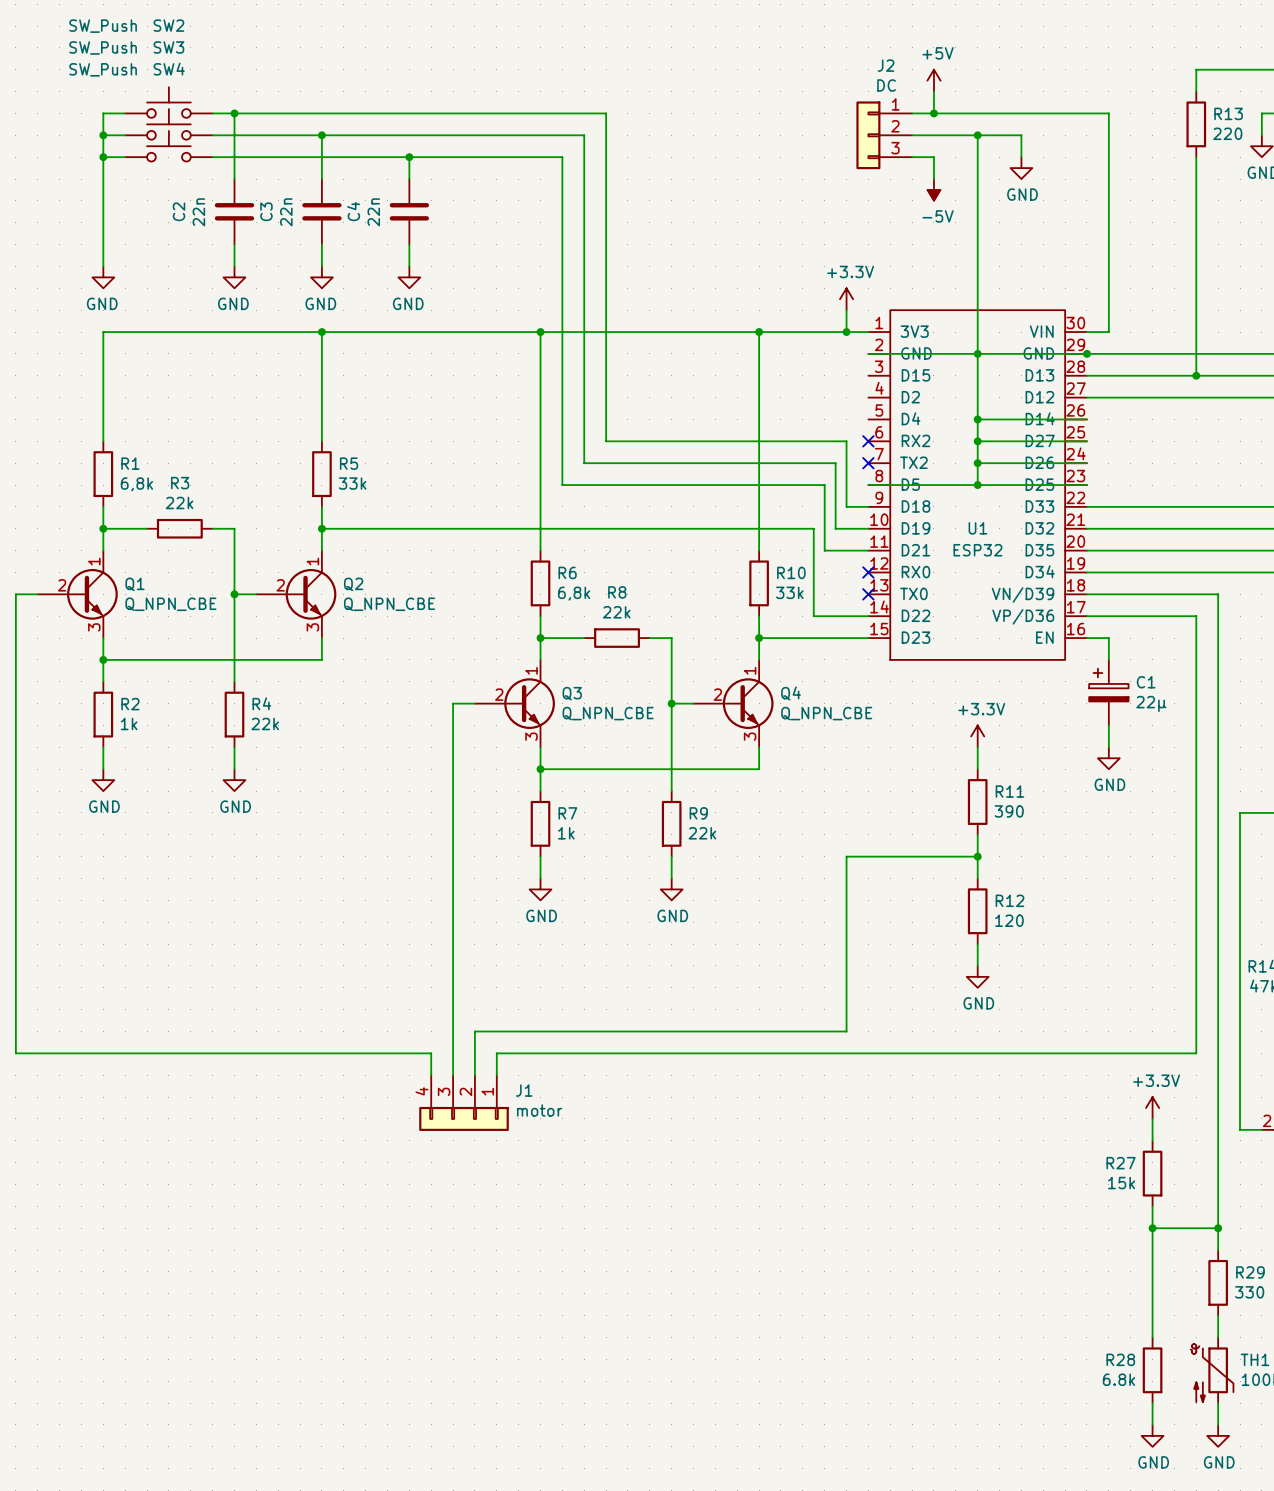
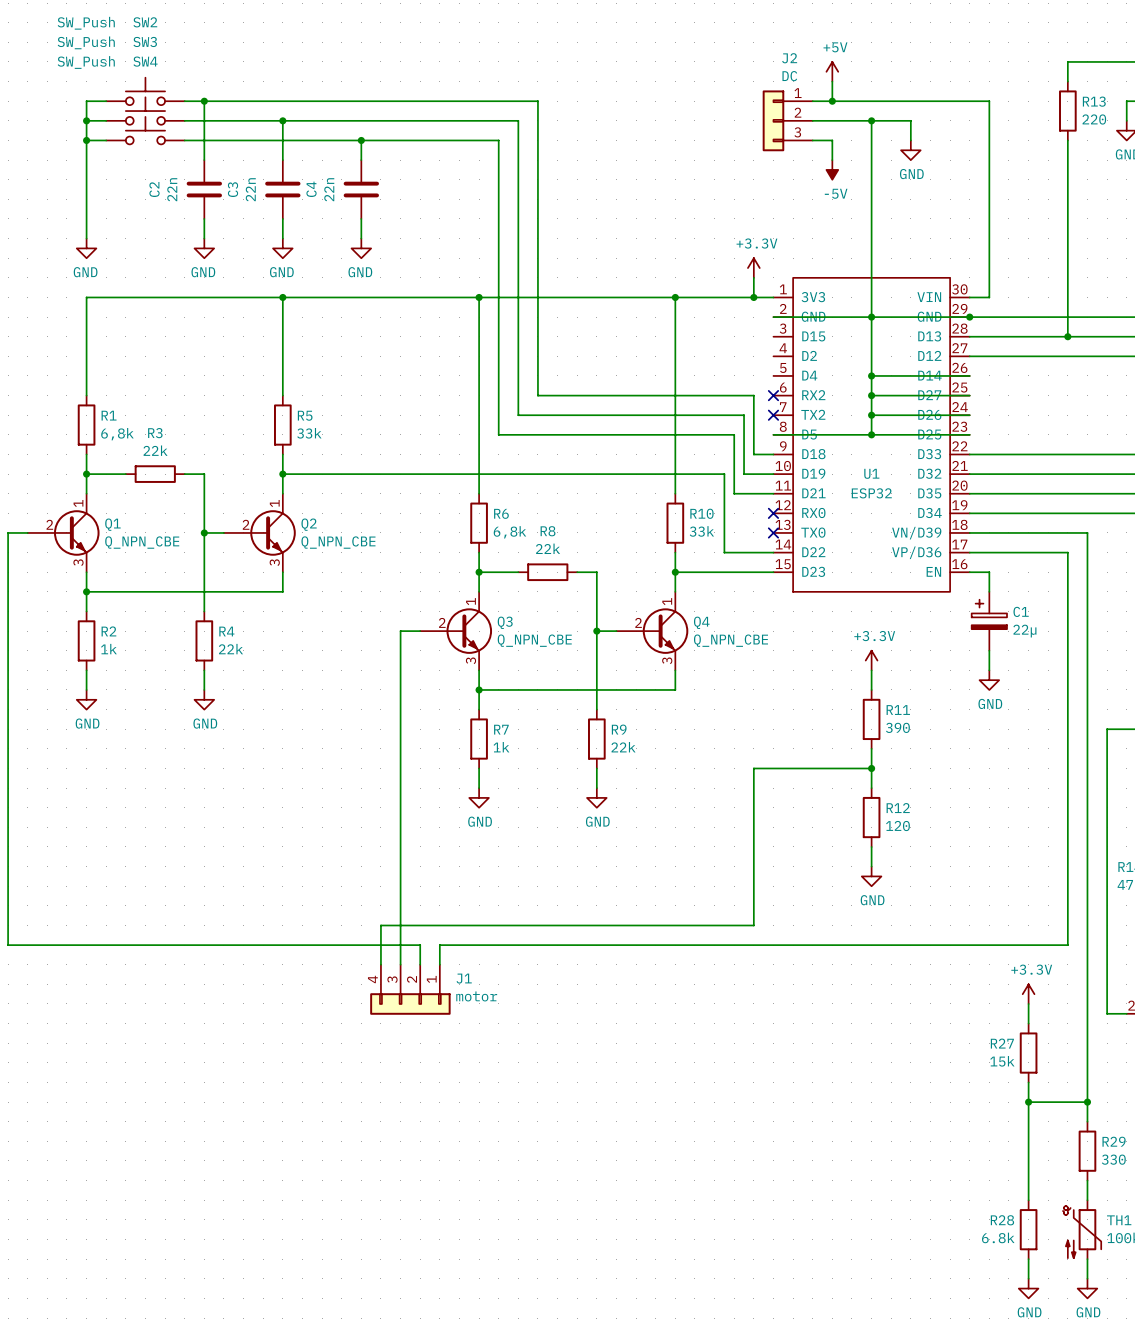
wire: (474, 1031) (474, 1053) -> (420, 925) (380, 925) (380, 945) (420, 945)

